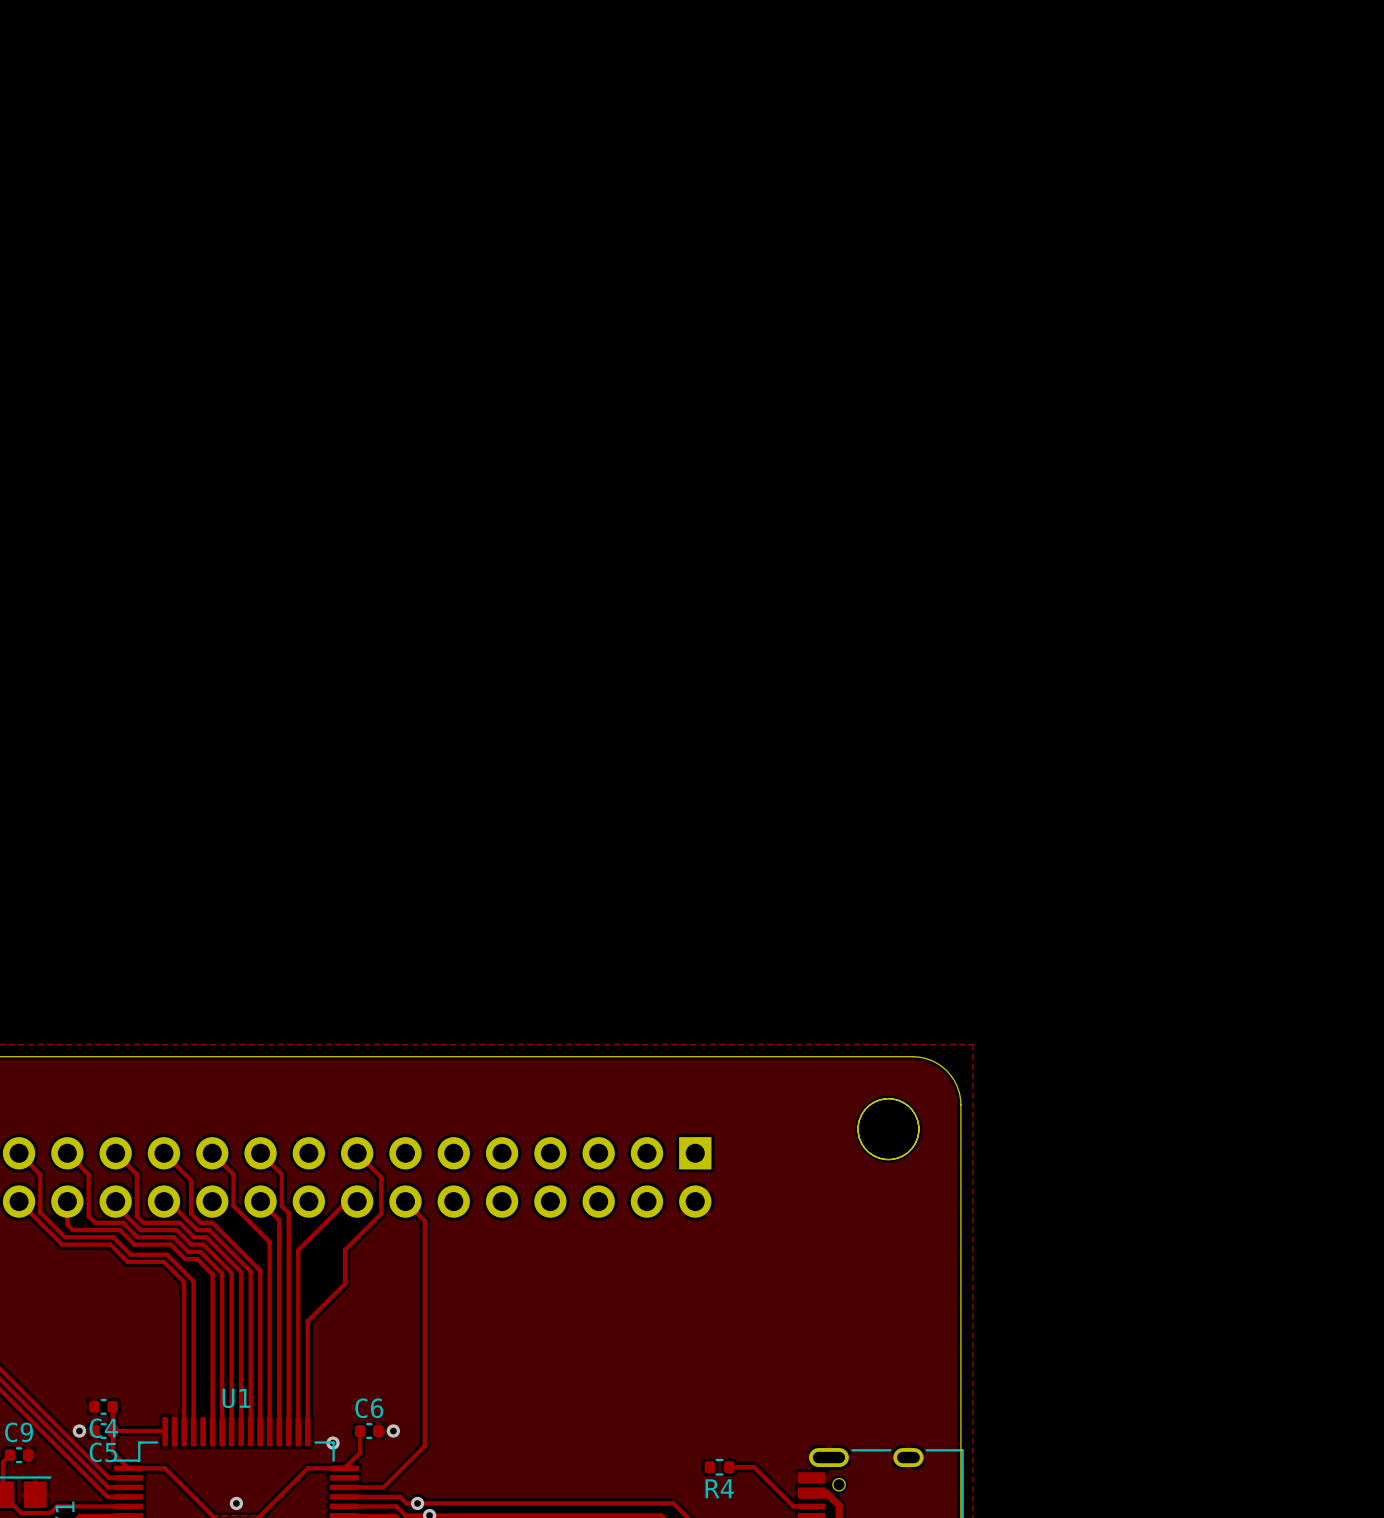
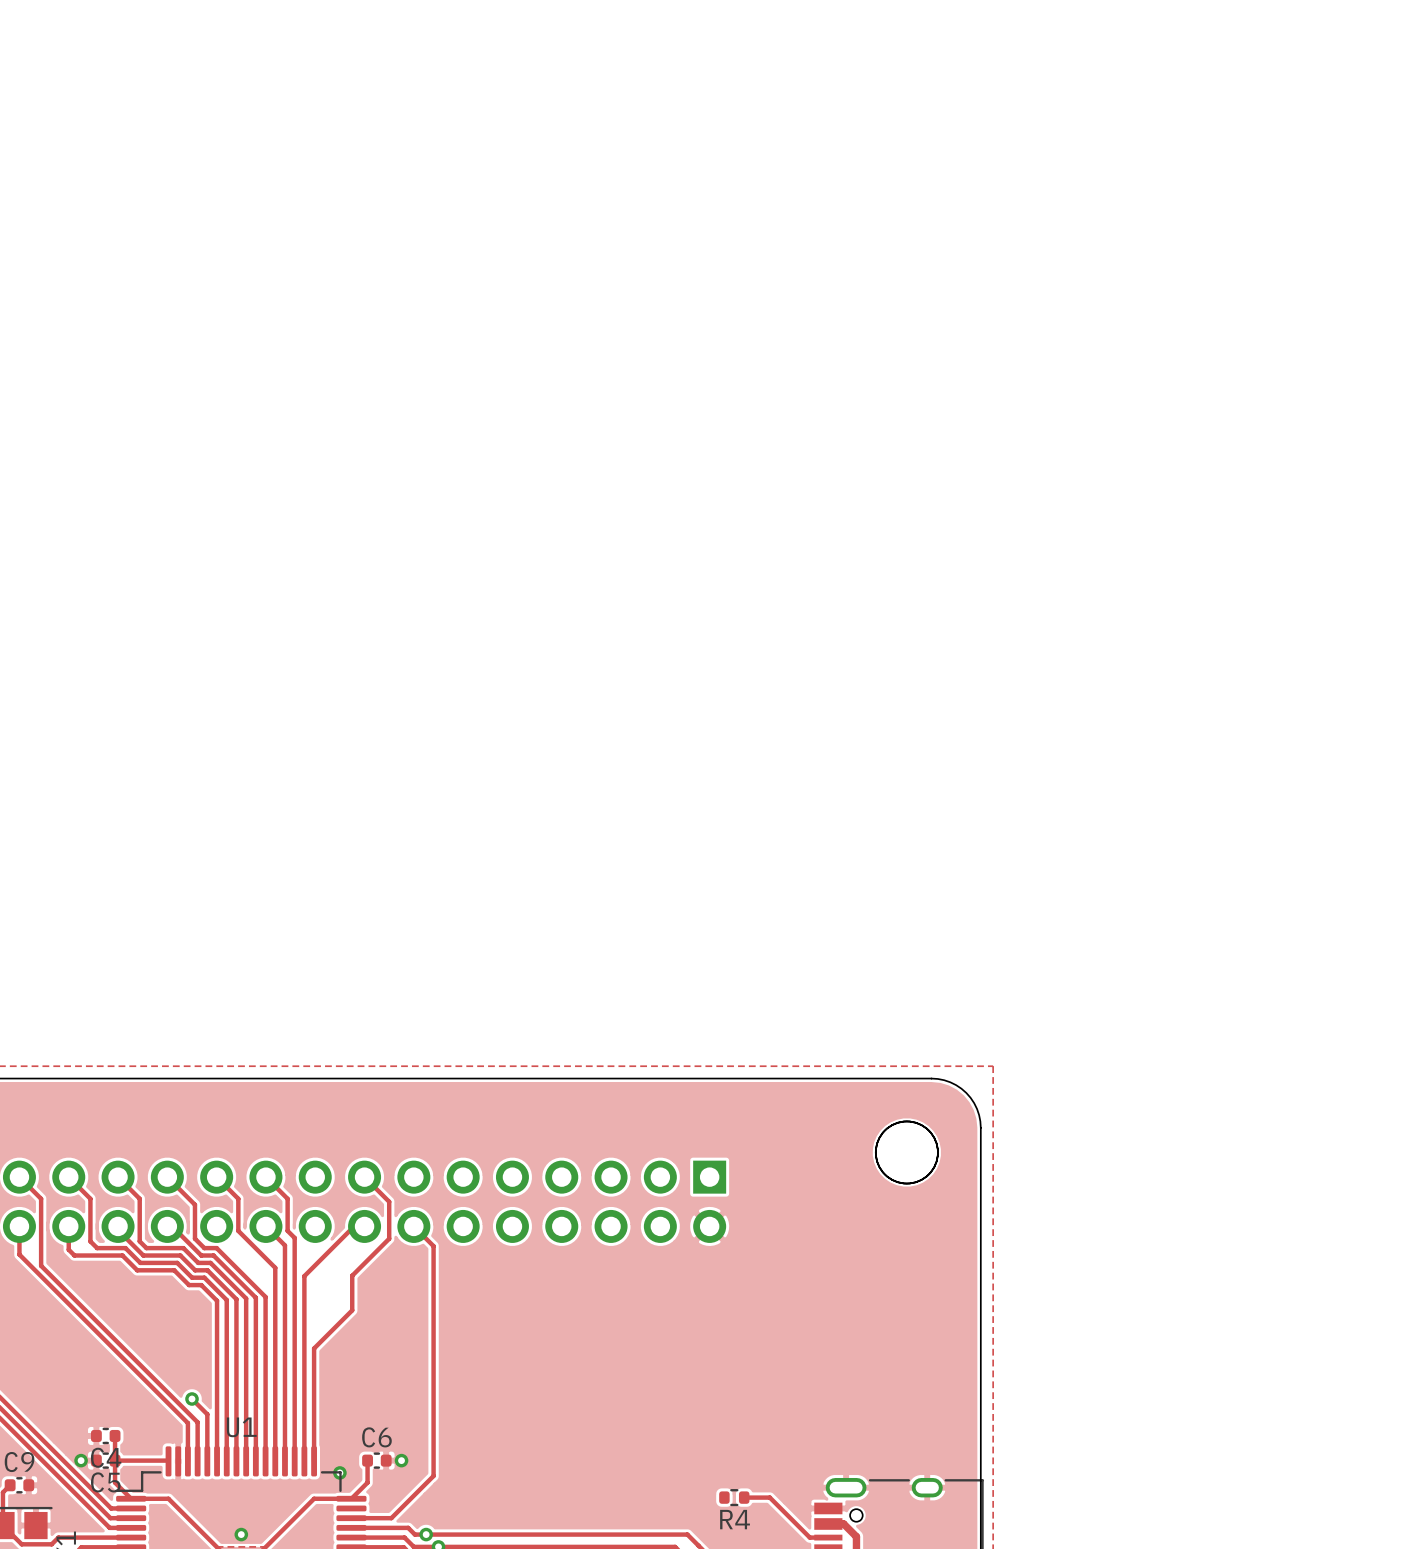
track: (19, 1201) (62, 1244) (110, 1244) (127, 1261) (163, 1261) (184, 1282) (184, 1394) -> (19, 1226) (19, 1254) (187, 1423)
track: (40, 1212) (65, 1237) (113, 1237) (130, 1254) (166, 1254) (193, 1281) (193, 1393) -> (41, 1237) (41, 1265) (197, 1422)
track: none -> (192, 1398) (207, 1414) (207, 1461)
via: none -> (192, 1398)

